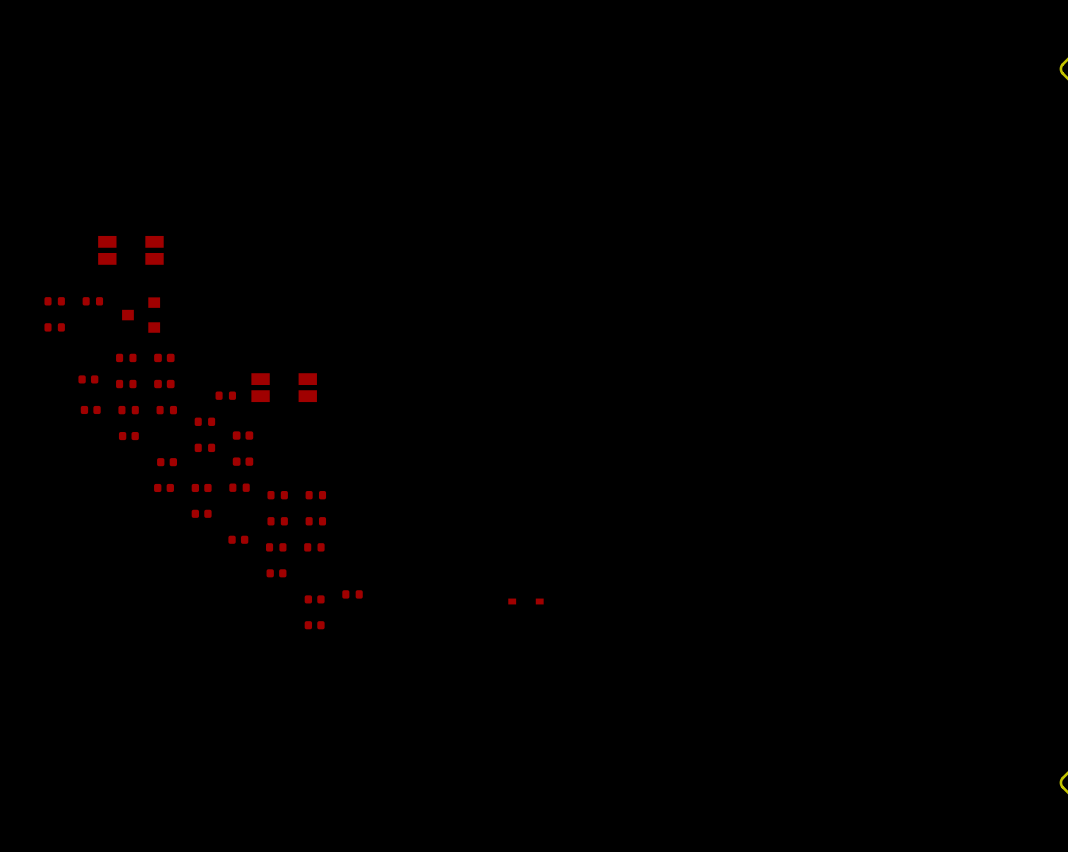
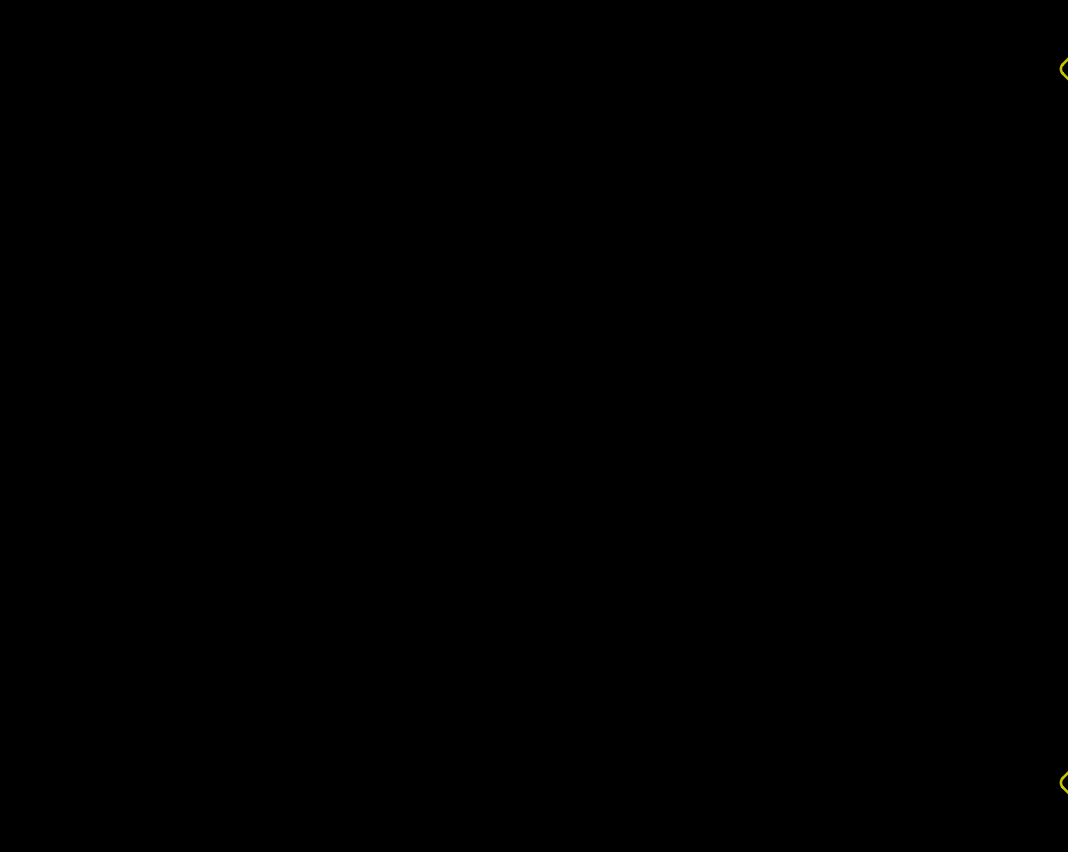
part: (130, 250) -> none
part: (54, 301) -> none
part: (92, 301) -> none
part: (141, 315) -> none
part: (54, 327) -> none
part: (126, 357) -> none
part: (164, 357) -> none
part: (88, 379) -> none
part: (126, 384) -> none
part: (164, 384) -> none
part: (284, 387) -> none
part: (225, 395) -> none
part: (90, 409) -> none
part: (128, 410) -> none
part: (166, 410) -> none
part: (204, 421) -> none
part: (243, 435) -> none
part: (128, 436) -> none
part: (204, 447) -> none
part: (243, 461) -> none
part: (167, 462) -> none
part: (164, 487) -> none
part: (201, 487) -> none
part: (239, 487) -> none
part: (277, 495) -> none
part: (315, 495) -> none
part: (201, 513) -> none
part: (277, 521) -> none
part: (315, 521) -> none
part: (238, 539) -> none
part: (276, 547) -> none
part: (314, 547) -> none
part: (276, 573) -> none
part: (352, 594) -> none
part: (314, 599) -> none
part: (525, 601) -> none
part: (314, 625) -> none

